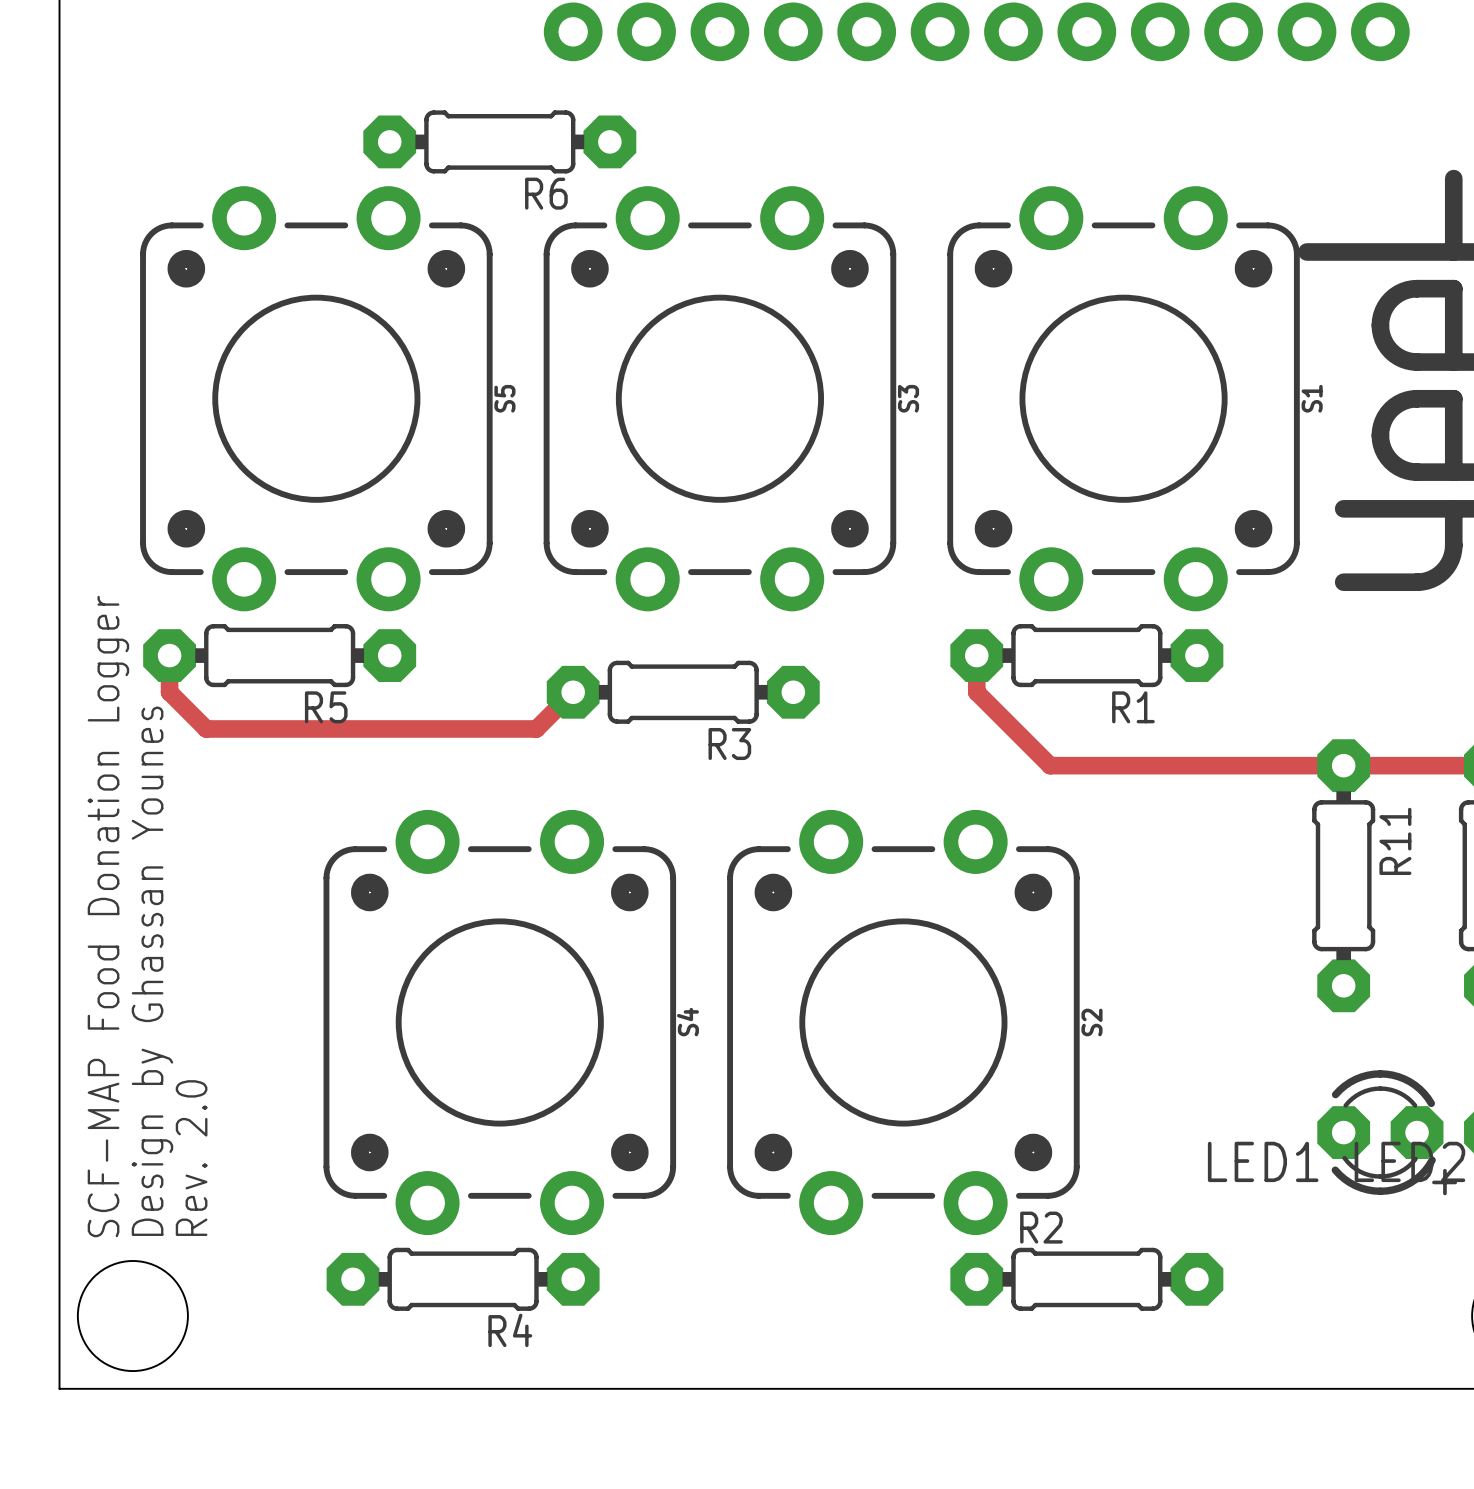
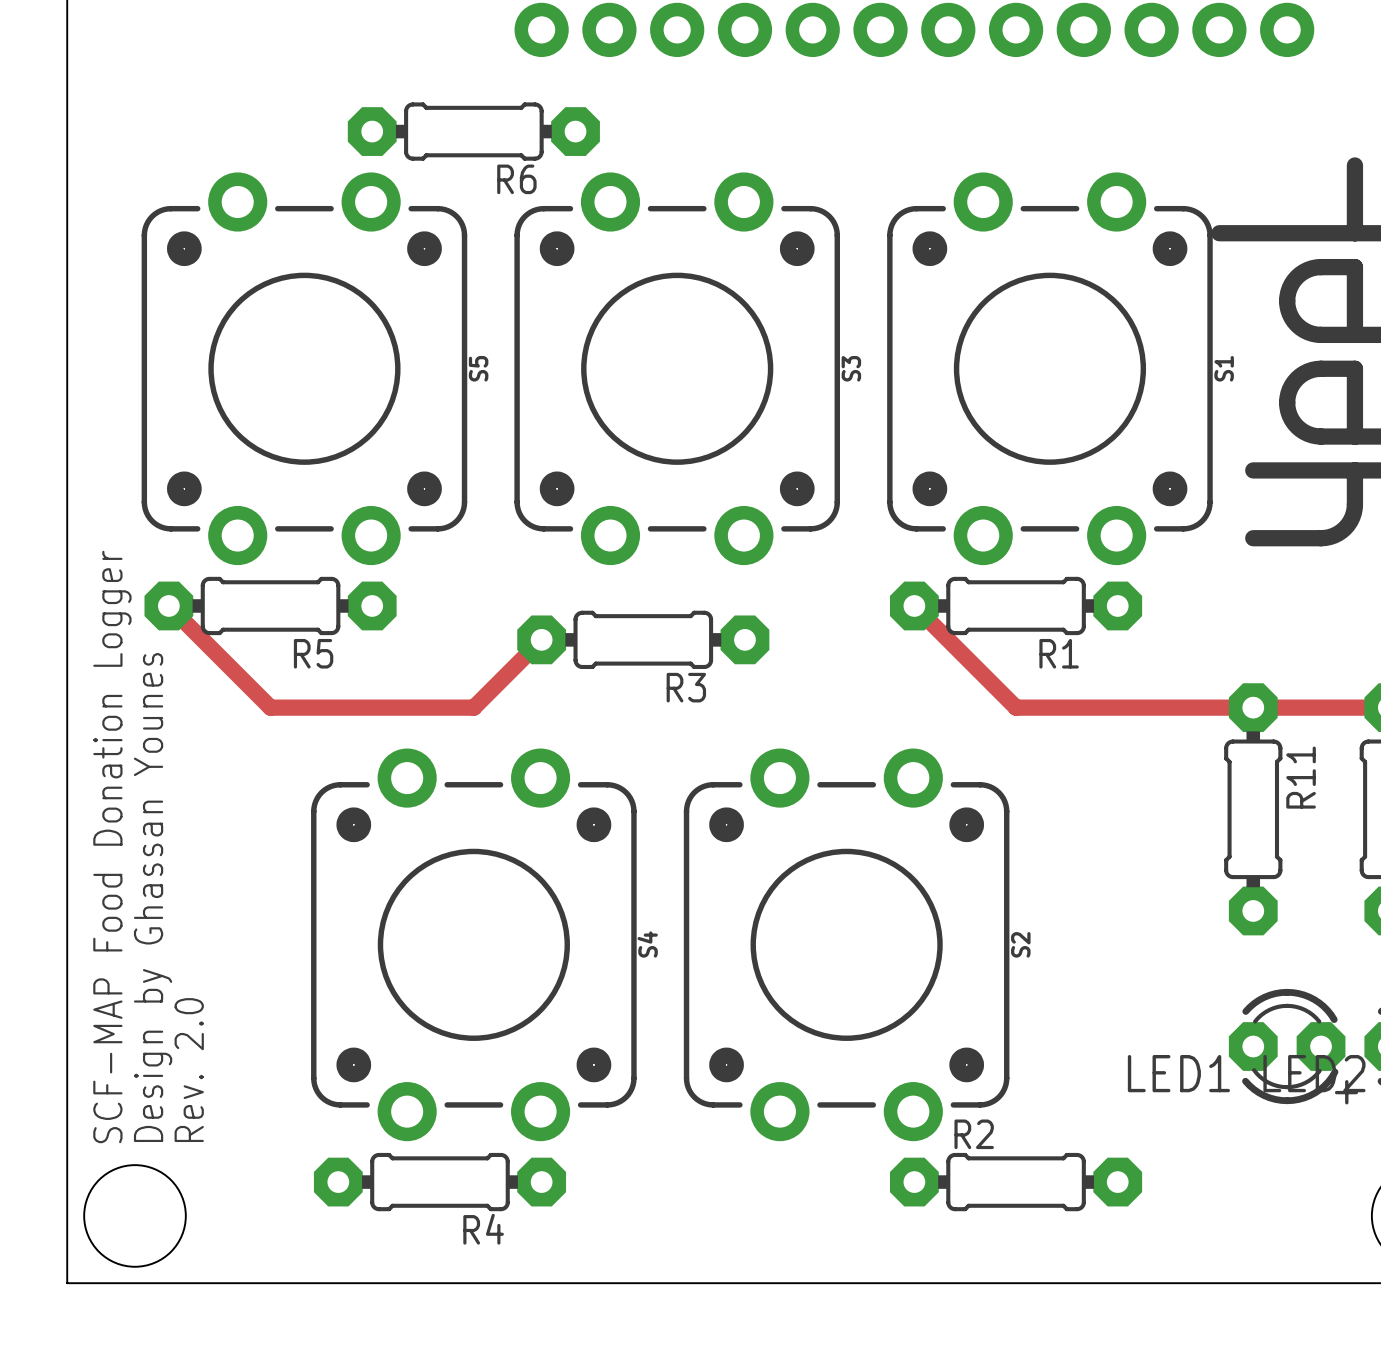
track: (169, 655) (169, 692) (206, 728) (536, 728) -> (168, 605) (270, 707) (473, 707) (507, 673)
track: (976, 655) (976, 692) (1050, 765) (1086, 765) -> (914, 605) (1016, 707)

